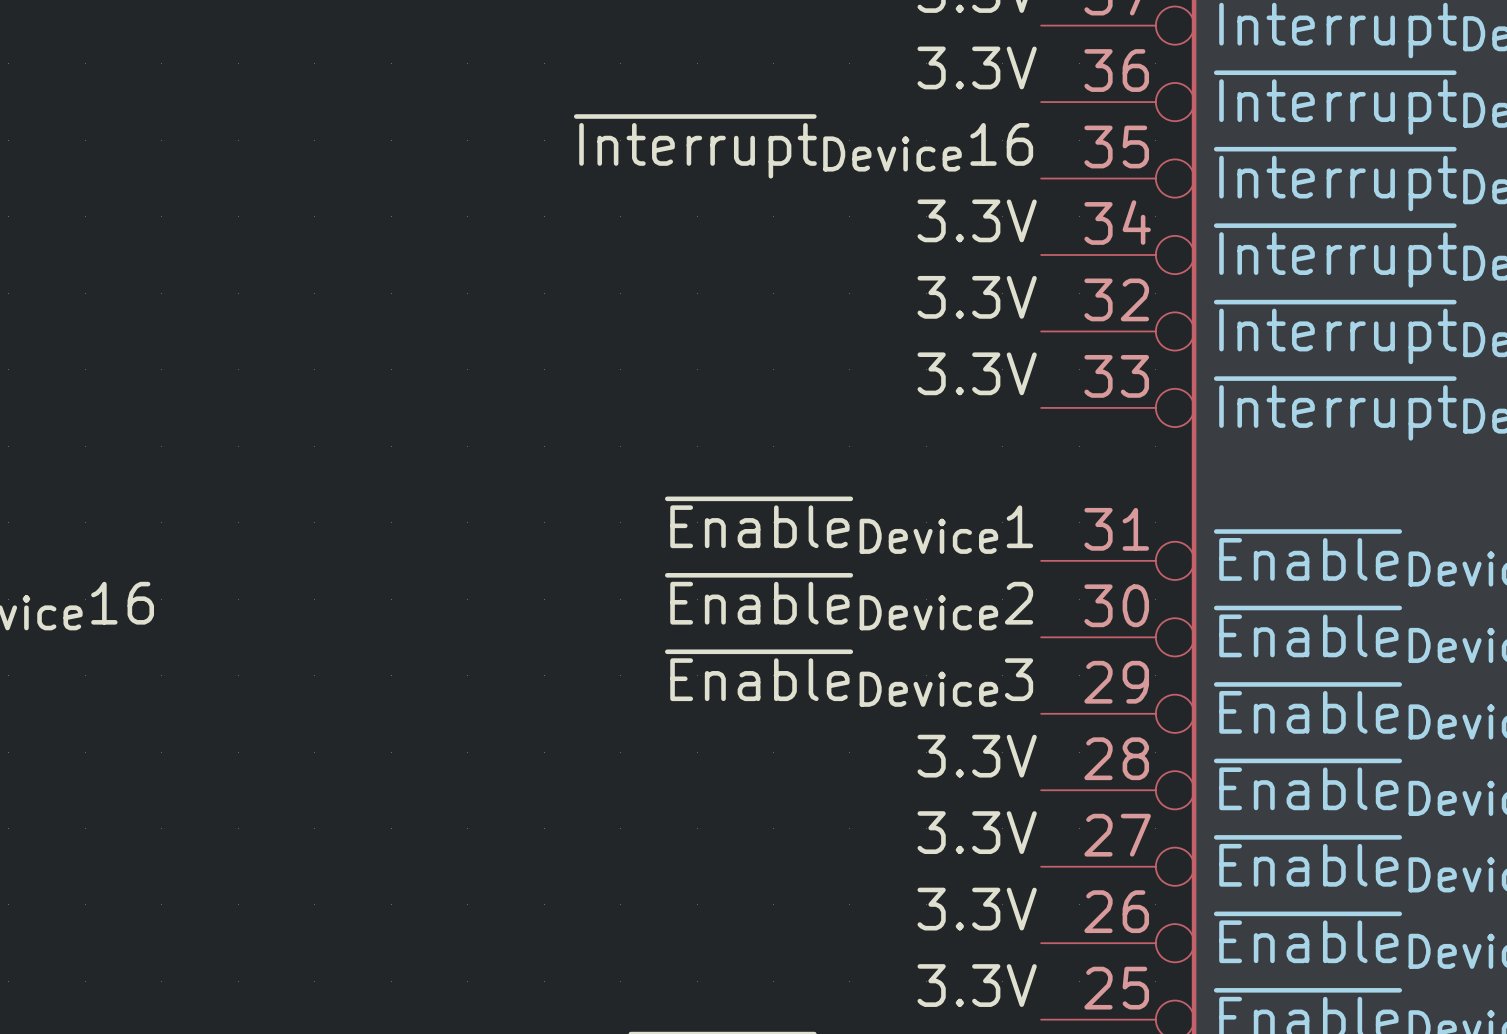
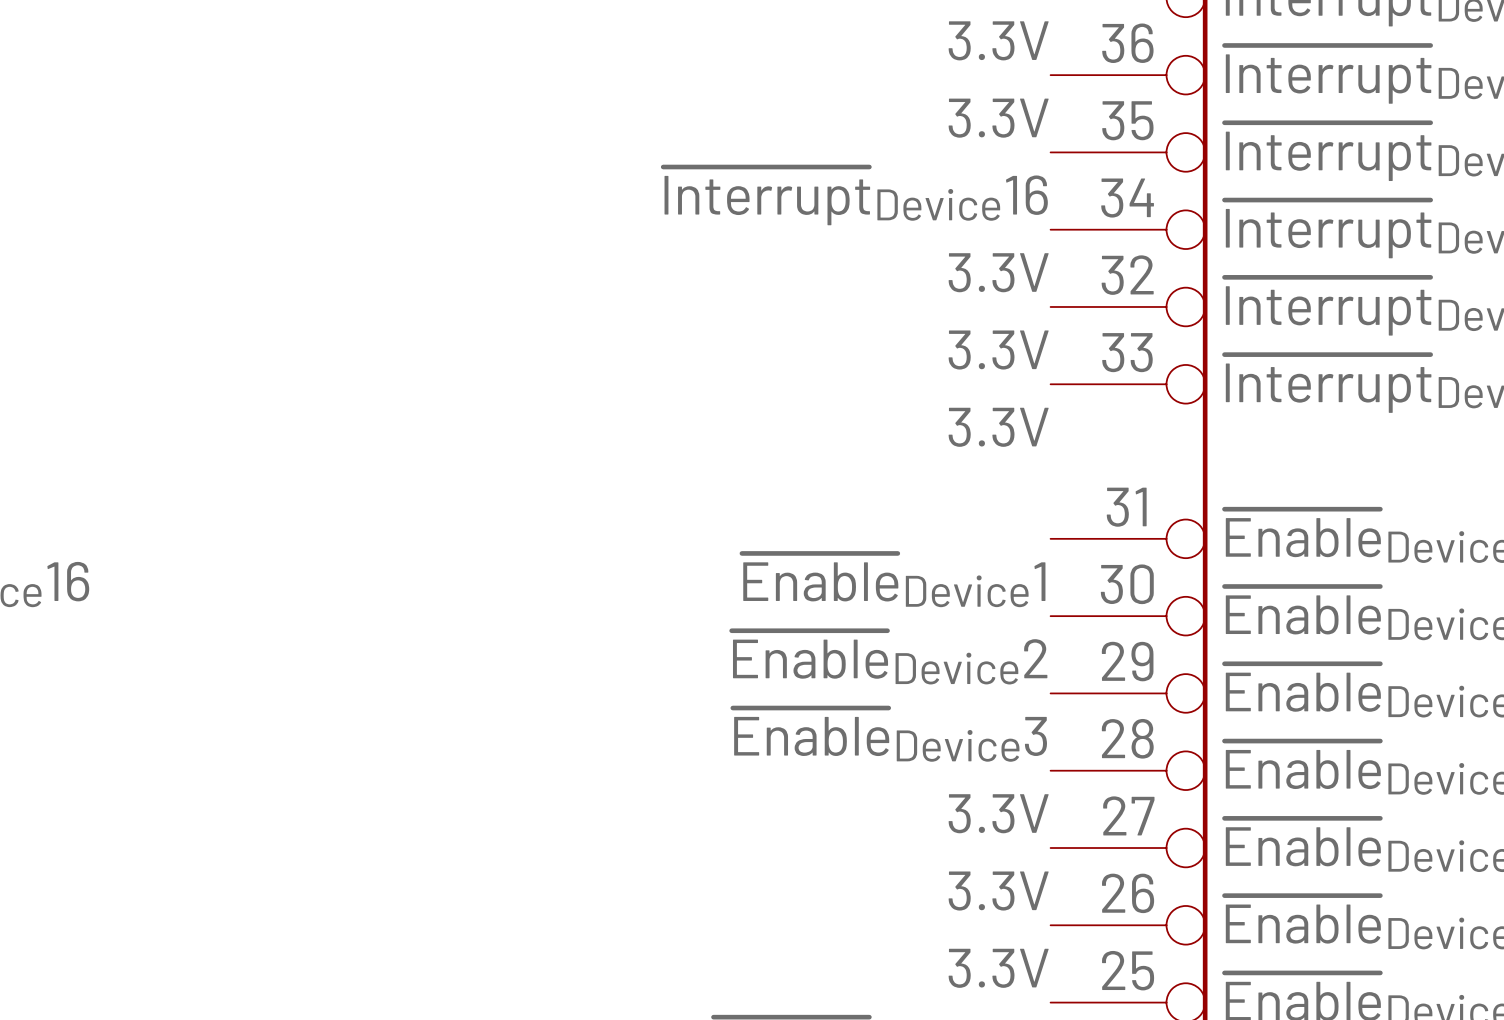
label: ~{Interrupt}Device16 (803, 146) -> 3.3V (998, 118)
label: 3.3V (977, 220) -> ~{Interrupt}Device16 (855, 196)
label: none -> 3.3V (998, 427)
label: ~{Enable}Device1 (849, 525) -> none
label: ~{Enable}Device2 (849, 601) -> ~{Enable}Device1 (893, 580)
label: ~{Enable}Device3 (849, 678) -> ~{Enable}Device2 (889, 657)
label: 3.3V (977, 756) -> ~{Enable}Device3 (889, 734)

